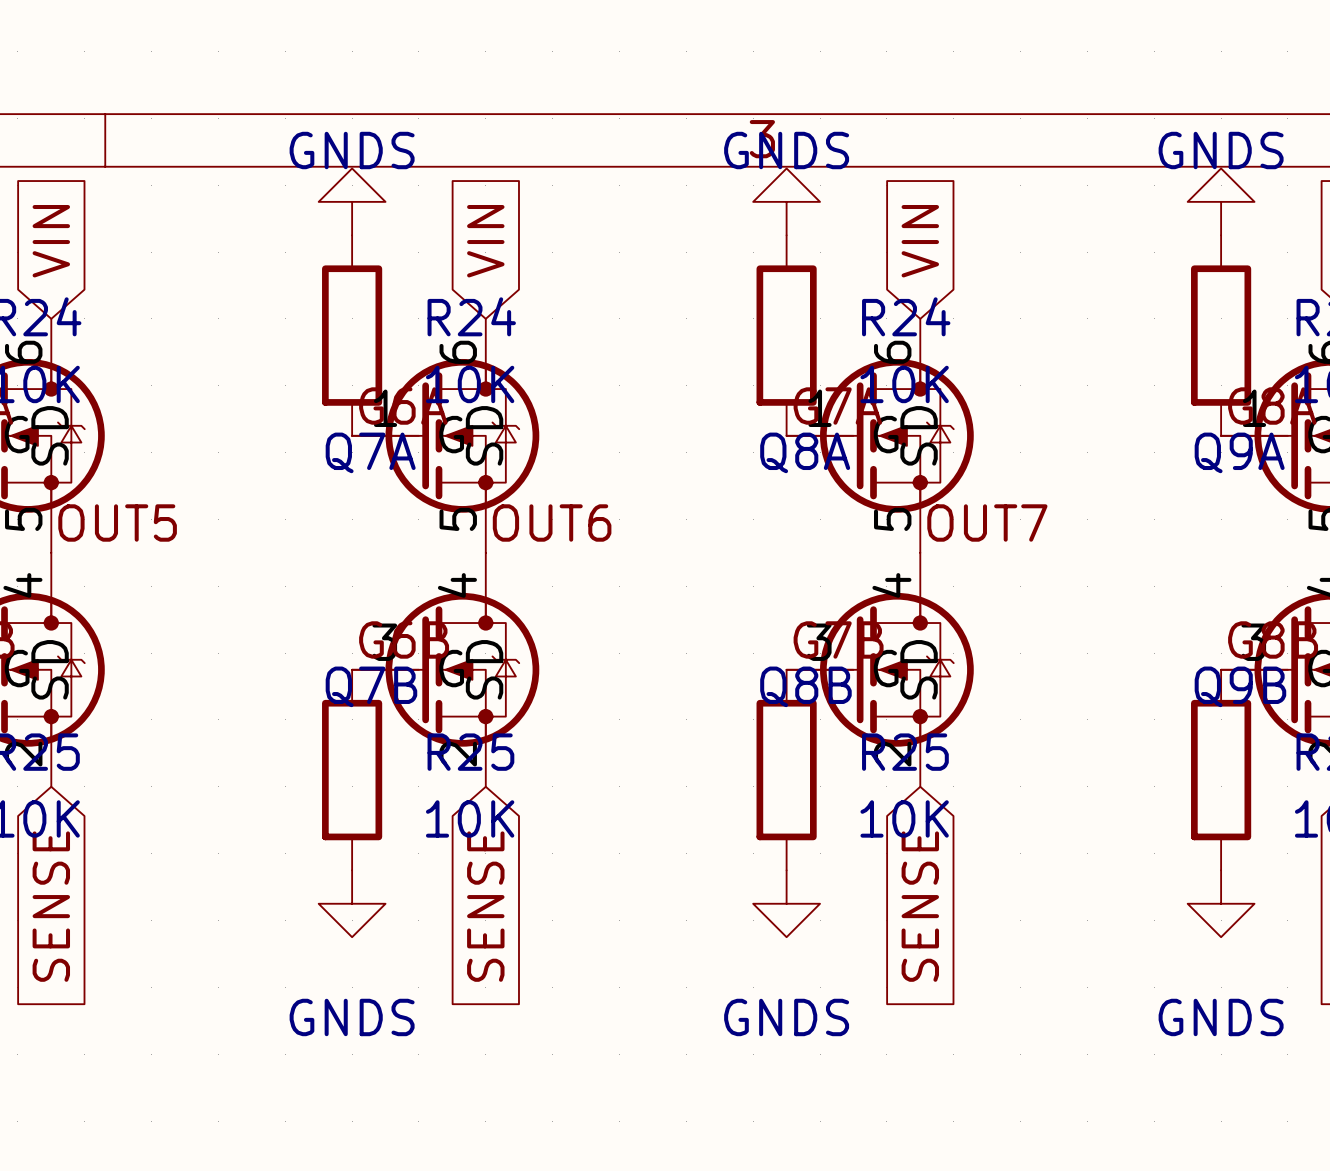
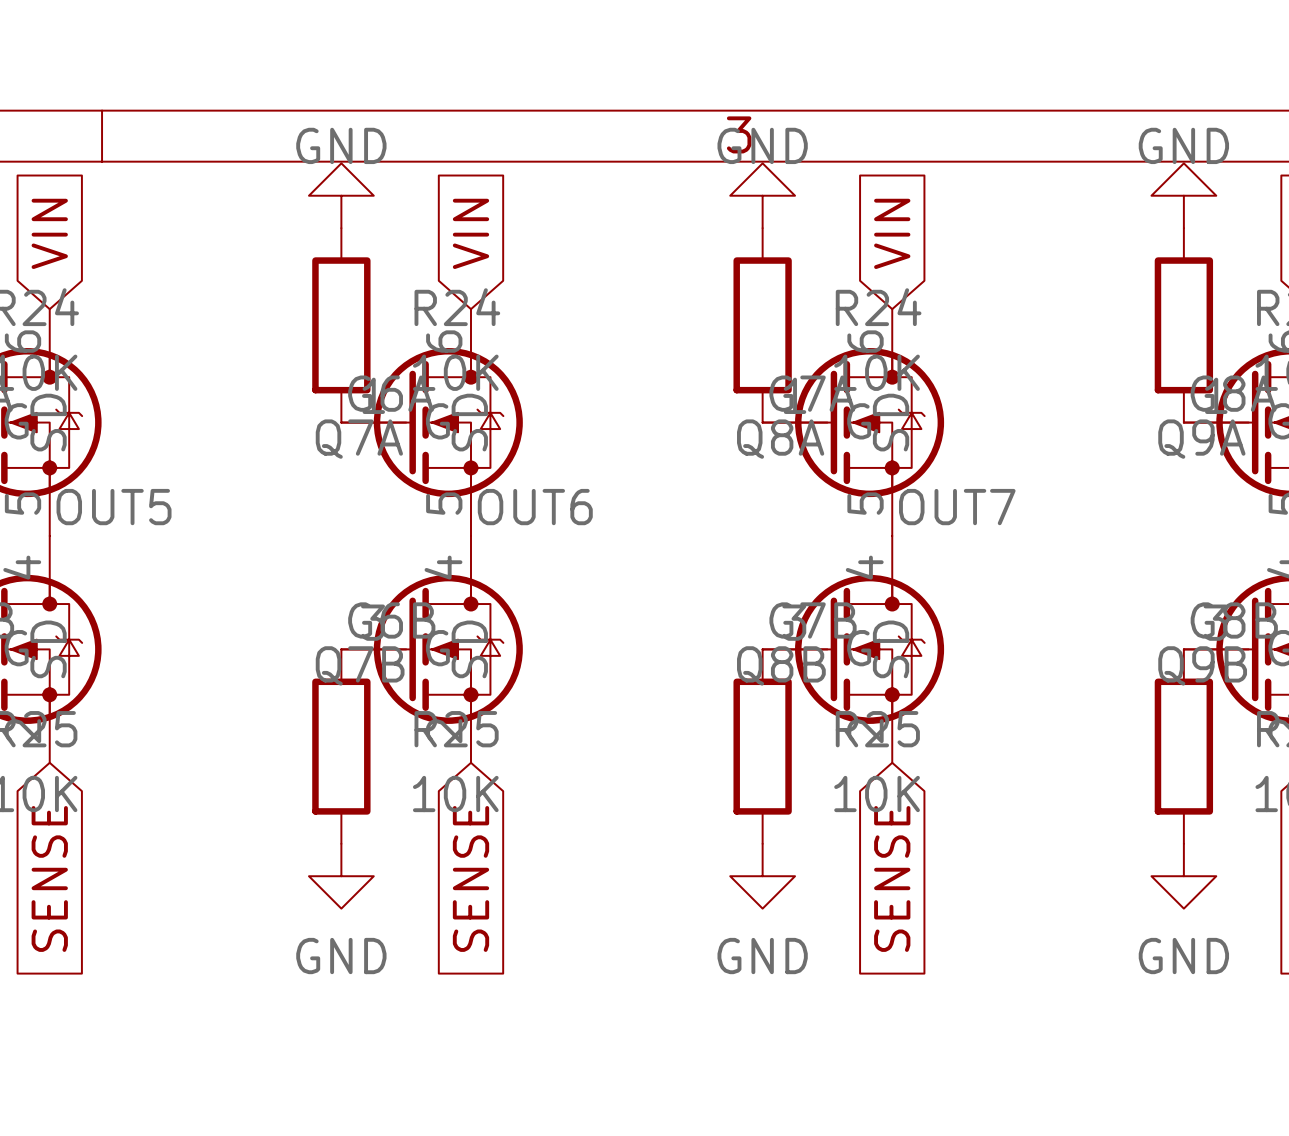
power symbol: GNDS (352, 201) -> GND (341, 195)
power symbol: GNDS (786, 201) -> GND (762, 195)
power symbol: GNDS (1221, 201) -> GND (1183, 195)
power symbol: GNDS (352, 903) -> GND (341, 876)
power symbol: GNDS (786, 903) -> GND (762, 876)
power symbol: GNDS (1221, 903) -> GND (1183, 876)

